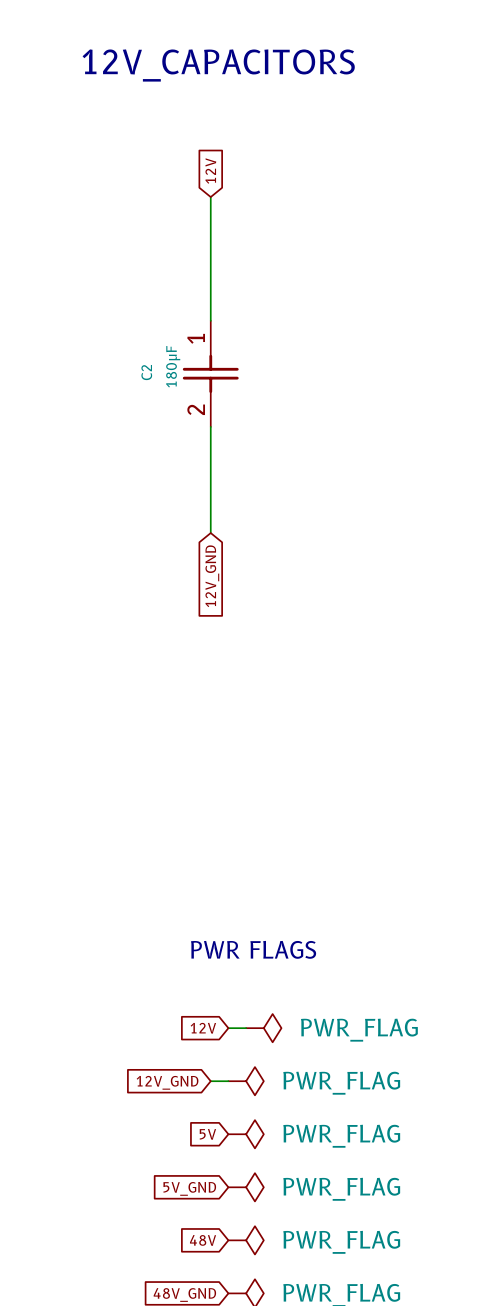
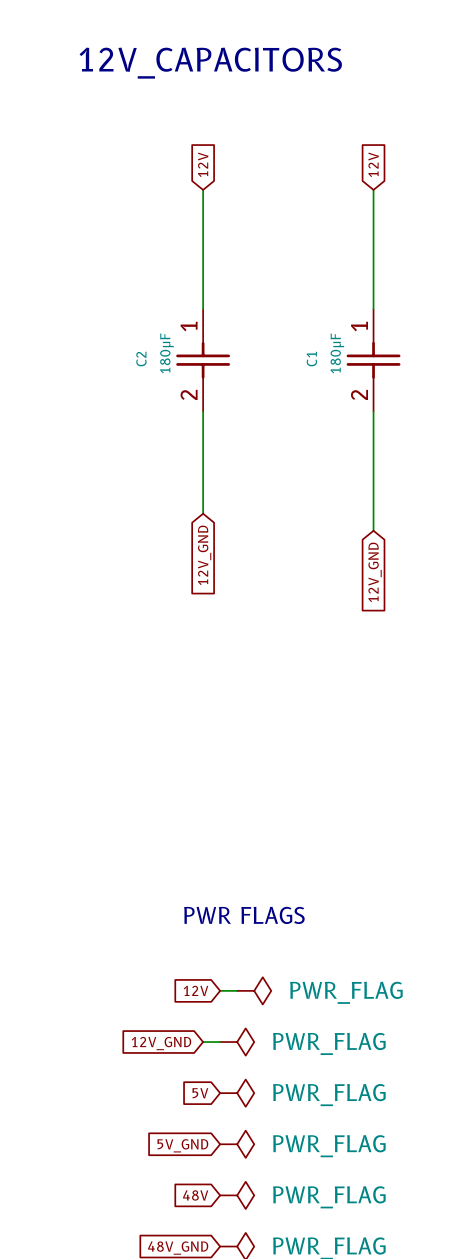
global label: none -> 12V (373, 164)
wire: none -> (373, 189) (373, 309)
C1: none -> 180μF (373, 360)
wire: none -> (373, 411) (373, 530)
global label: none -> 12V_GND (375, 572)

